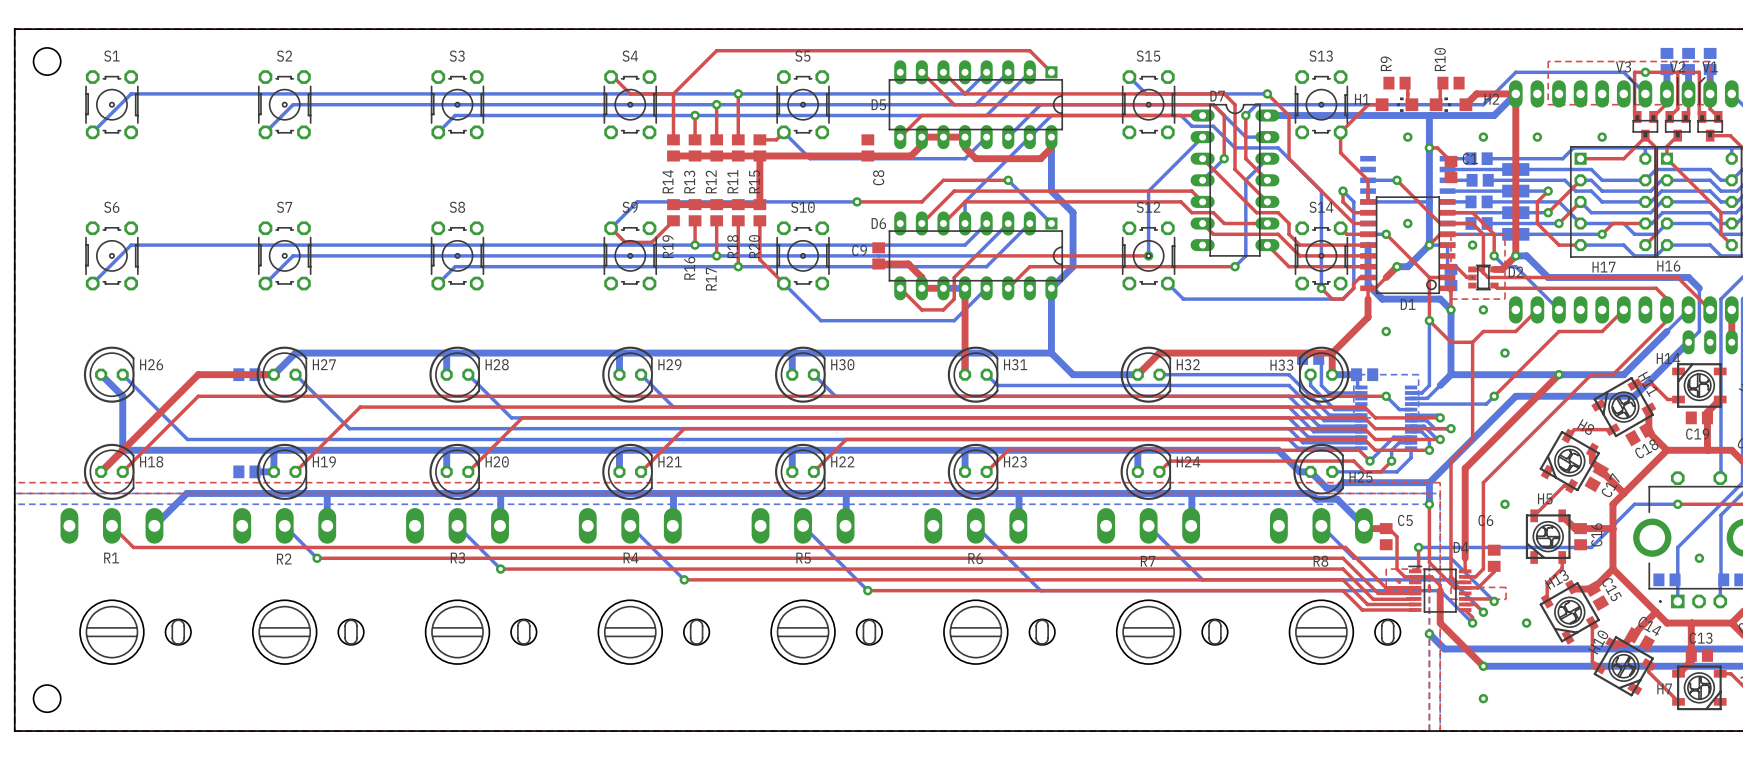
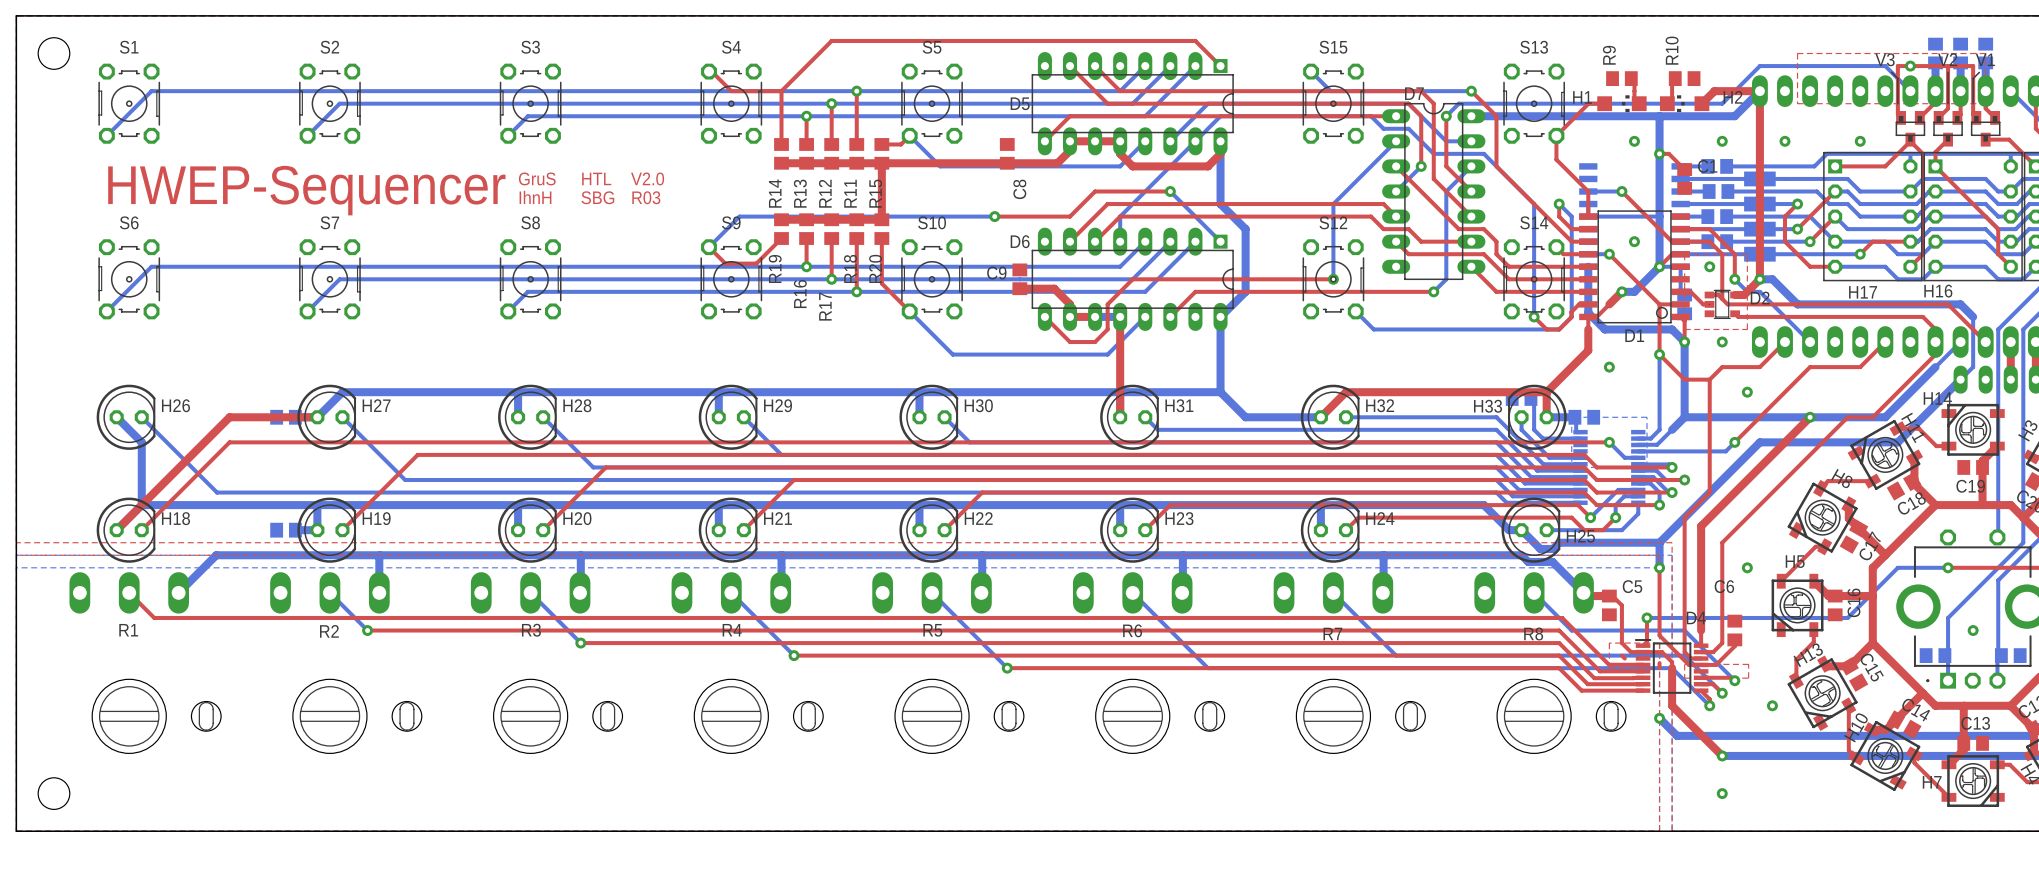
text: none -> GruS (537, 178)
text: none -> HTL (596, 178)
text: none -> V2.0 (647, 178)
text: none -> HWEP-Sequencer (306, 190)
text: none -> IhnH (535, 197)
text: none -> SBG (597, 197)
text: none -> R03 (646, 197)

